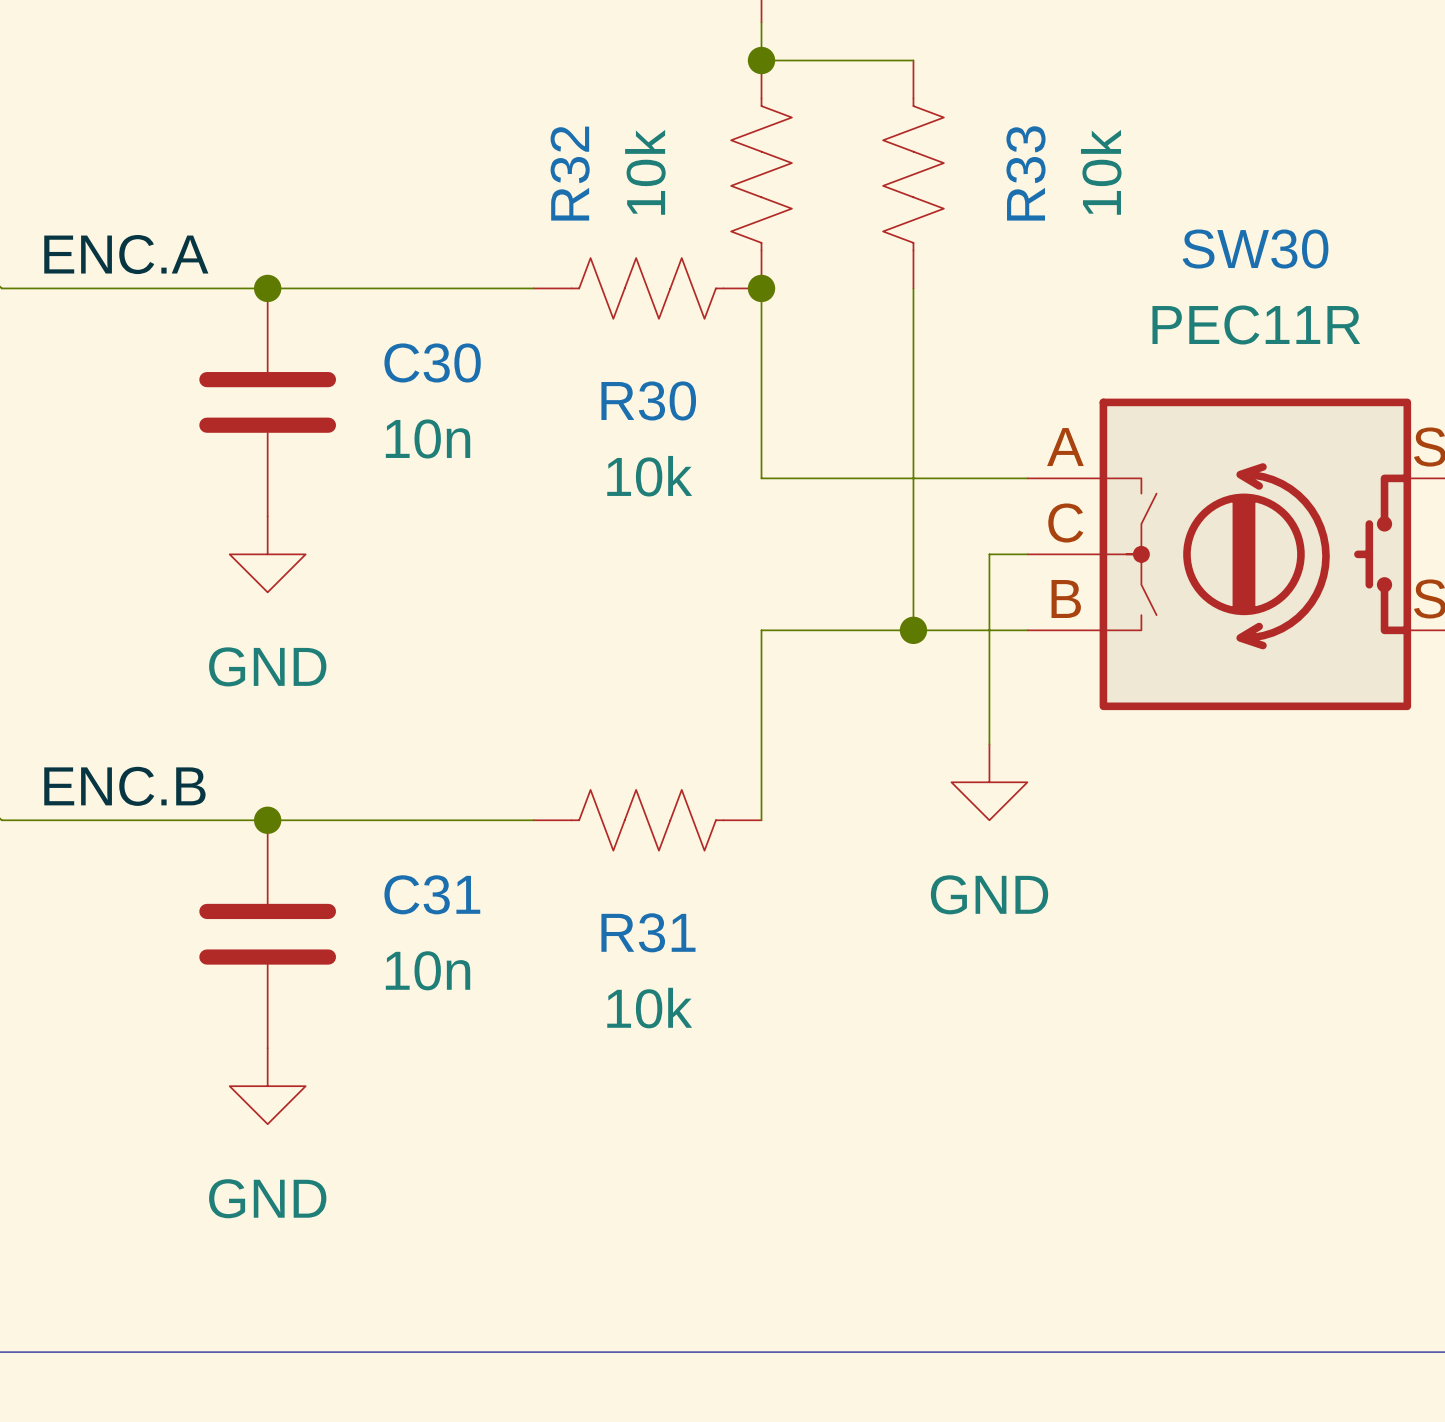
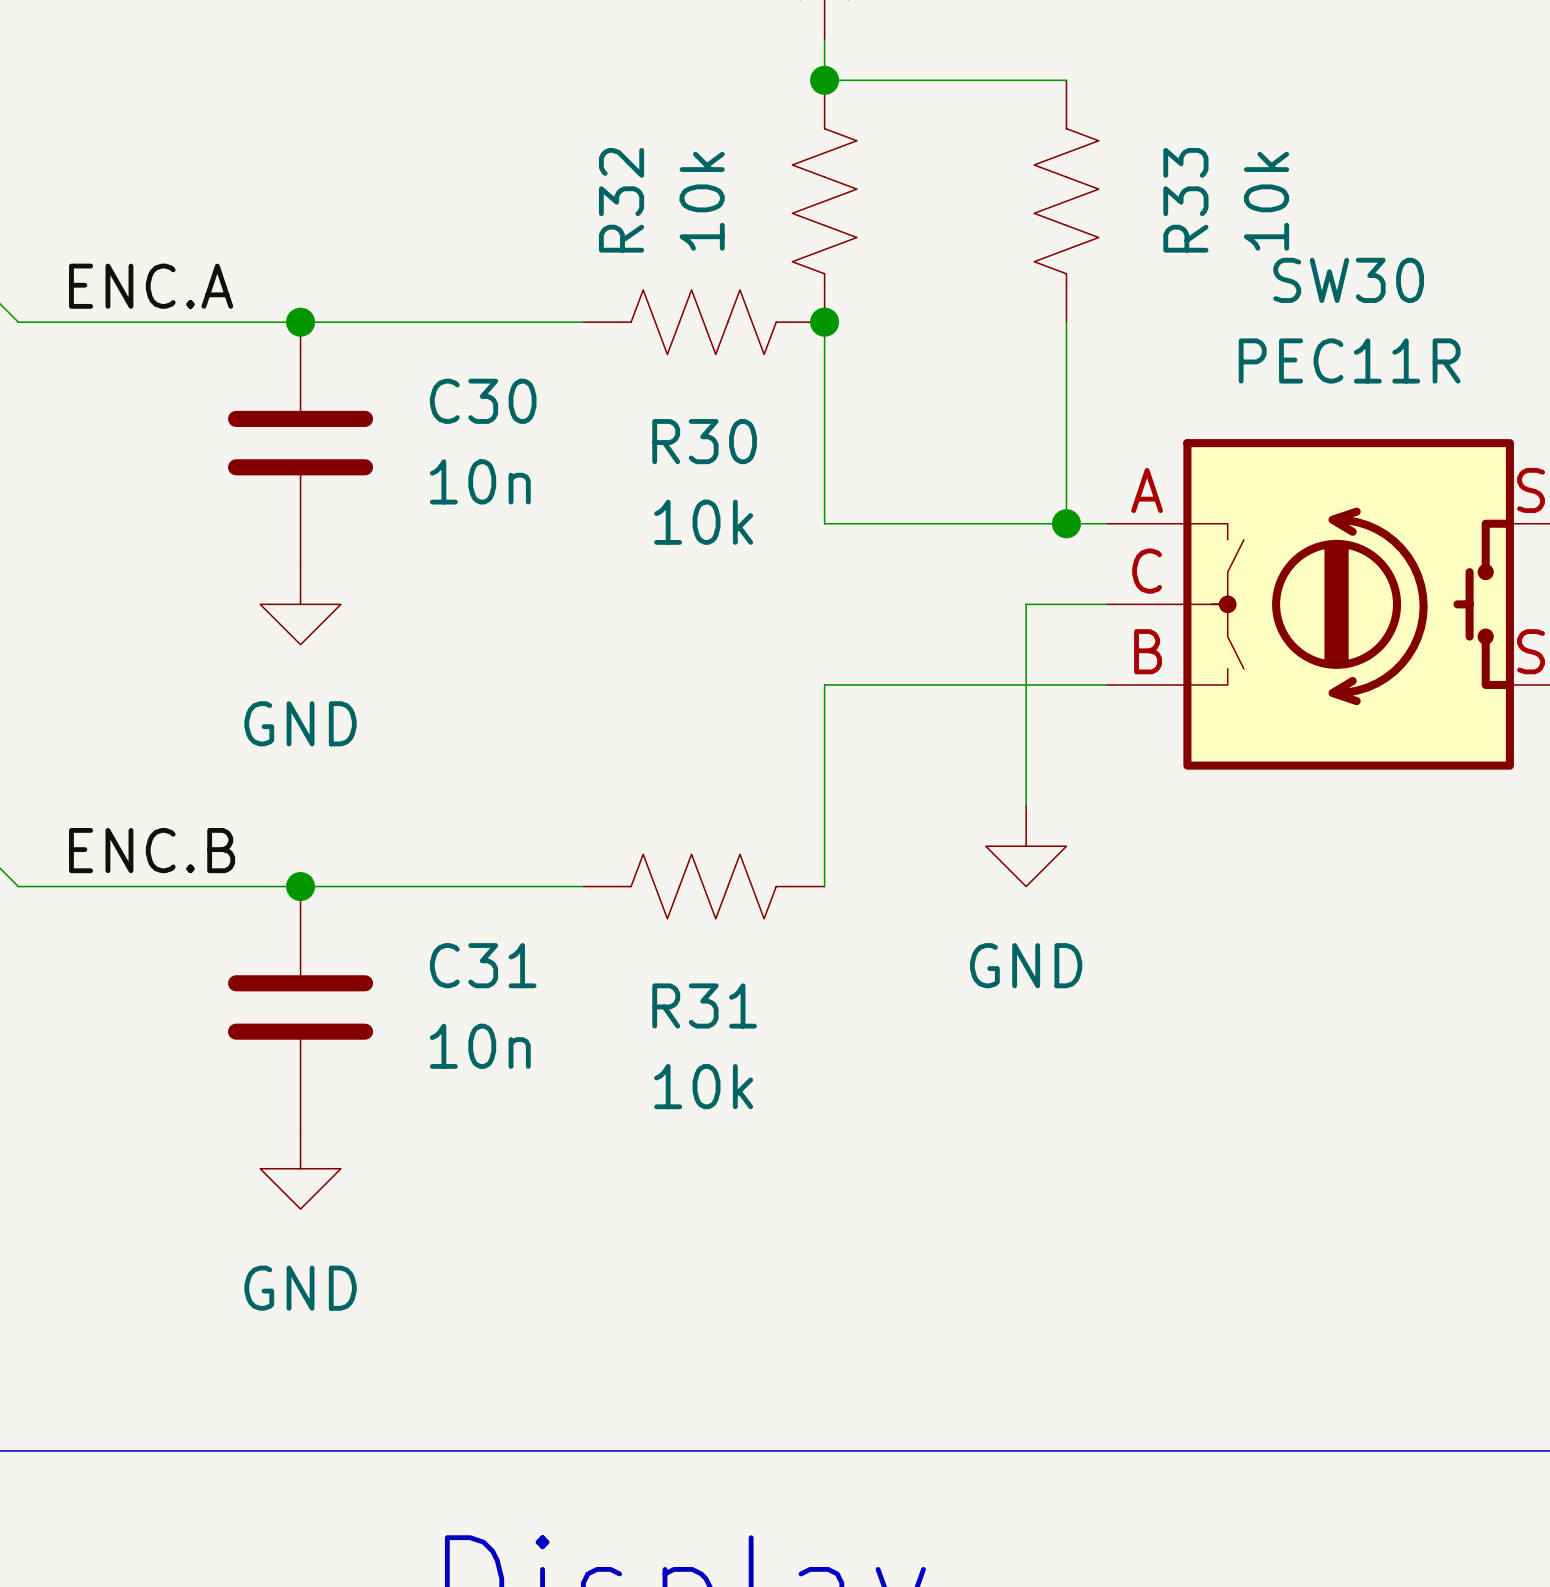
wire: none -> (985, 80) (1066, 80)
R33 position: (913, 174) -> (1066, 201)
wire: (913, 288) (913, 630) -> none
wire: none -> (1066, 322) (1066, 523)
wire: (989, 554) (989, 744) -> (1066, 604) (1026, 604) (1026, 805)
junction position: (913, 630) -> (1066, 523)
power symbol position: GND (989, 782) -> GND (1026, 846)

